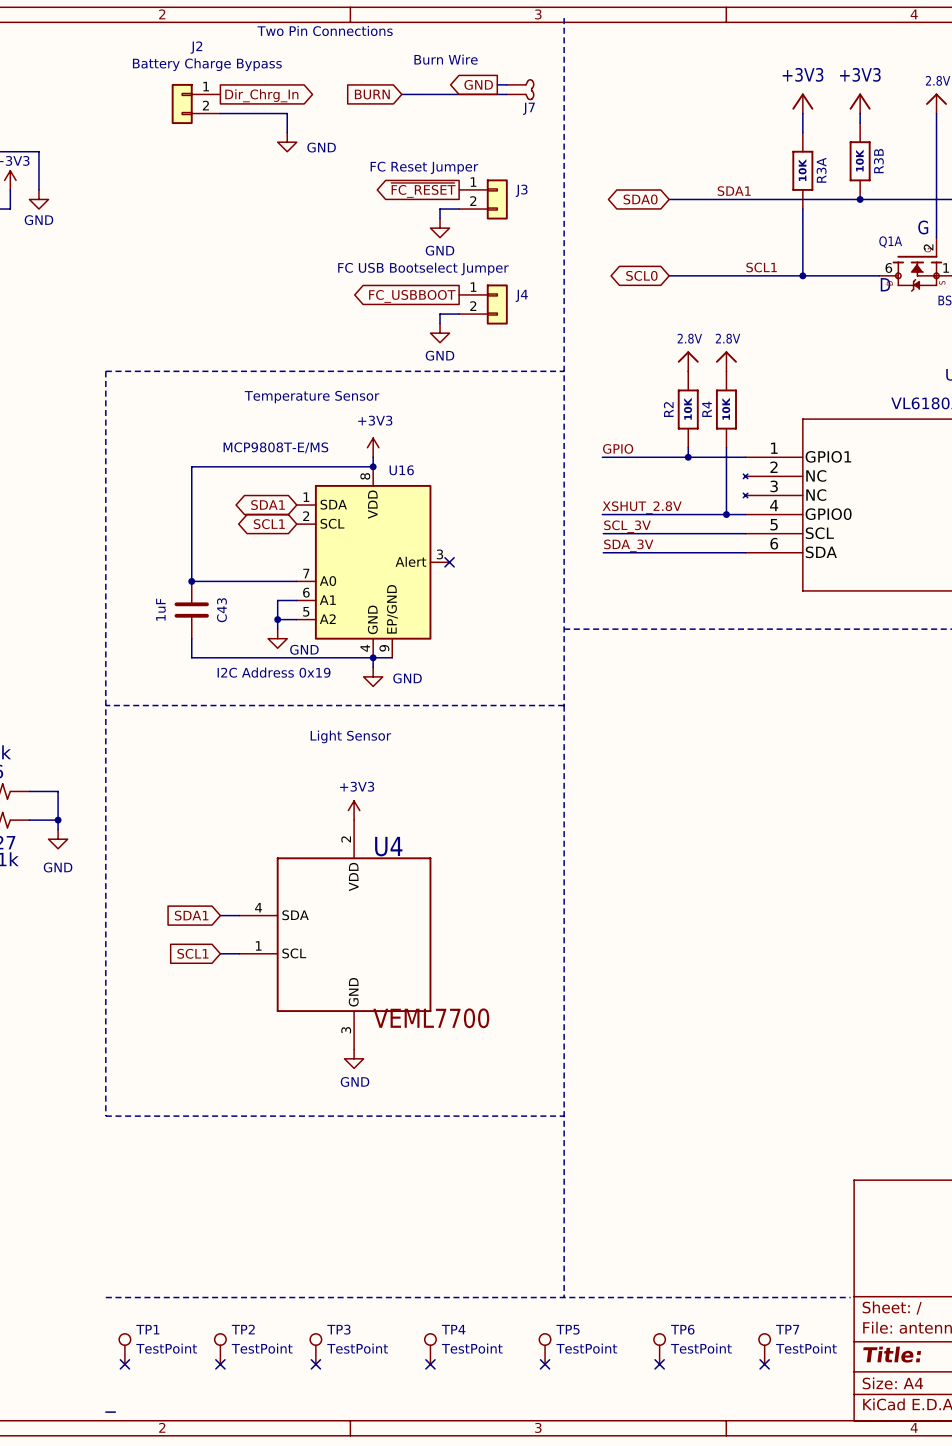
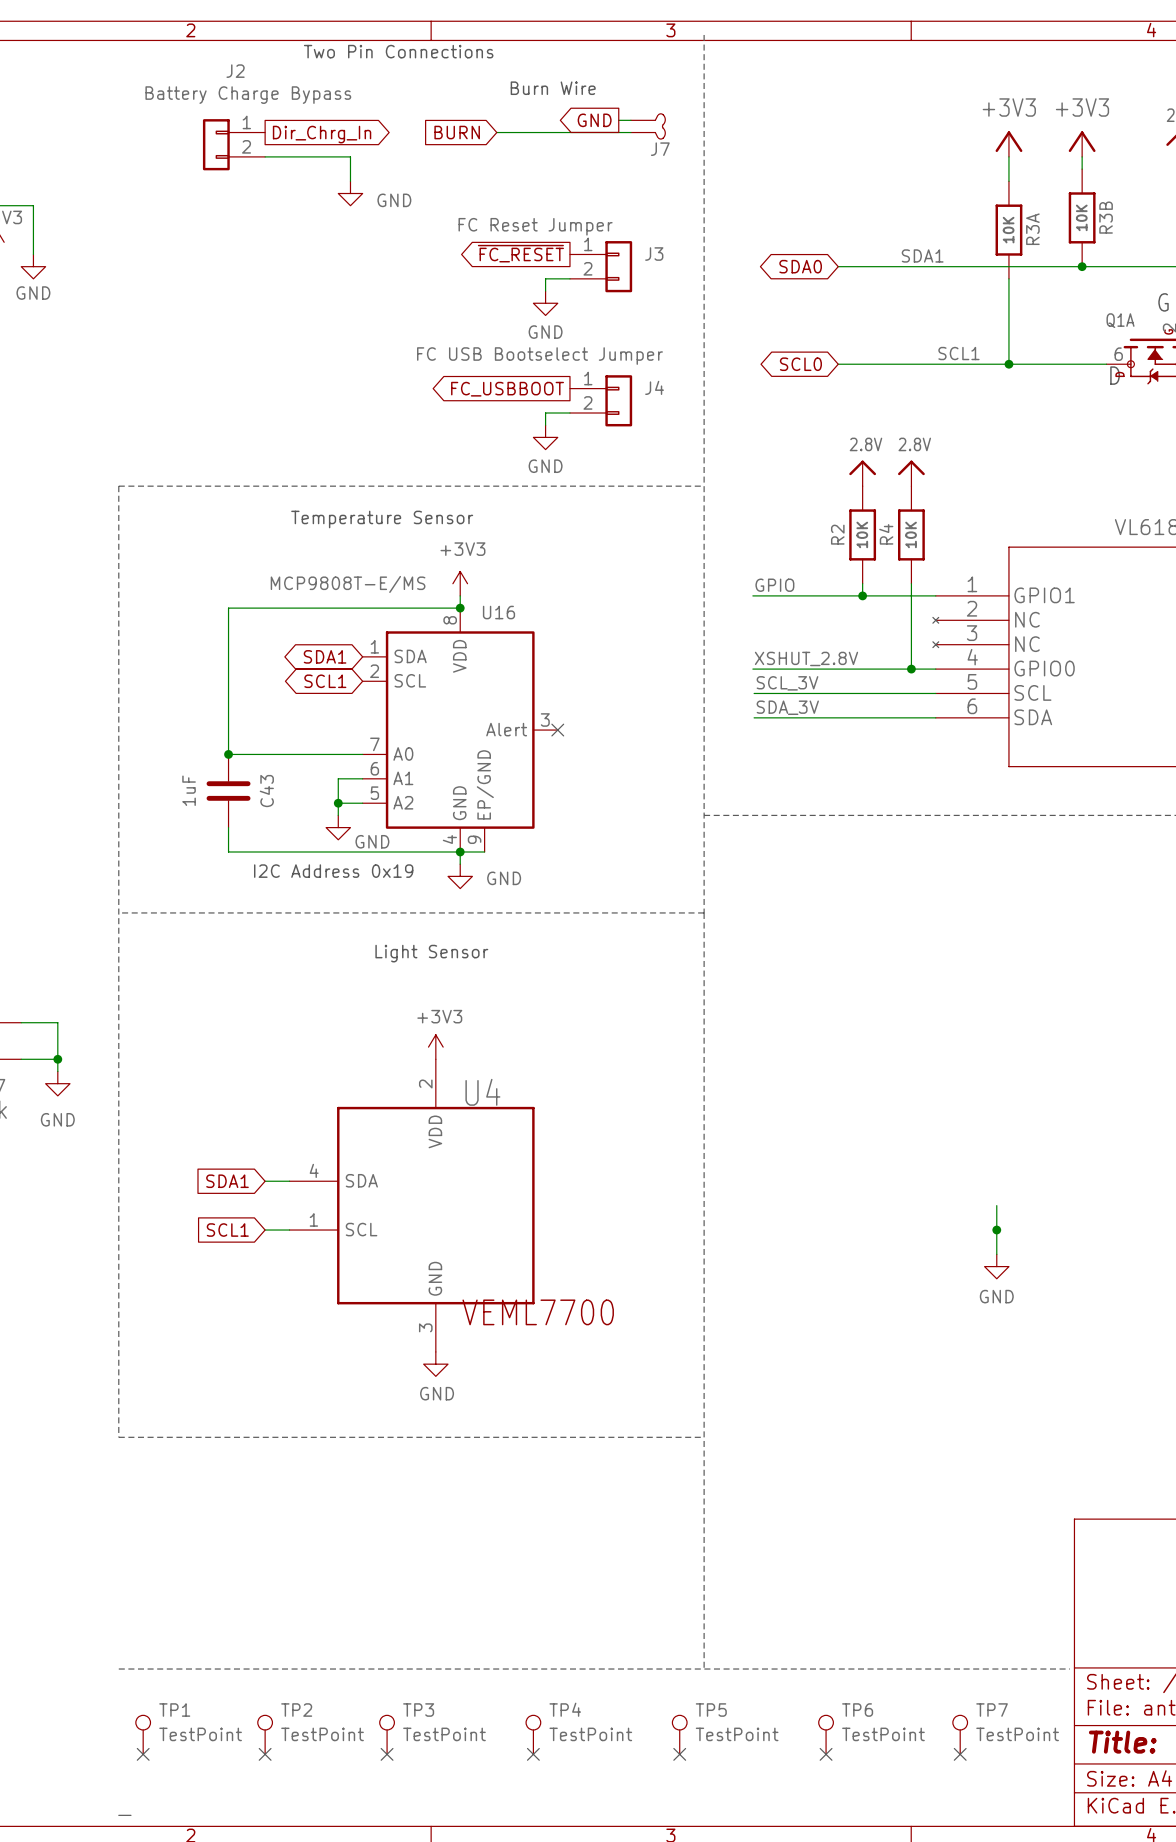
wire: none -> (996, 1205) (996, 1254)
junction: none -> (996, 1230)
power symbol: none -> GND (996, 1266)

